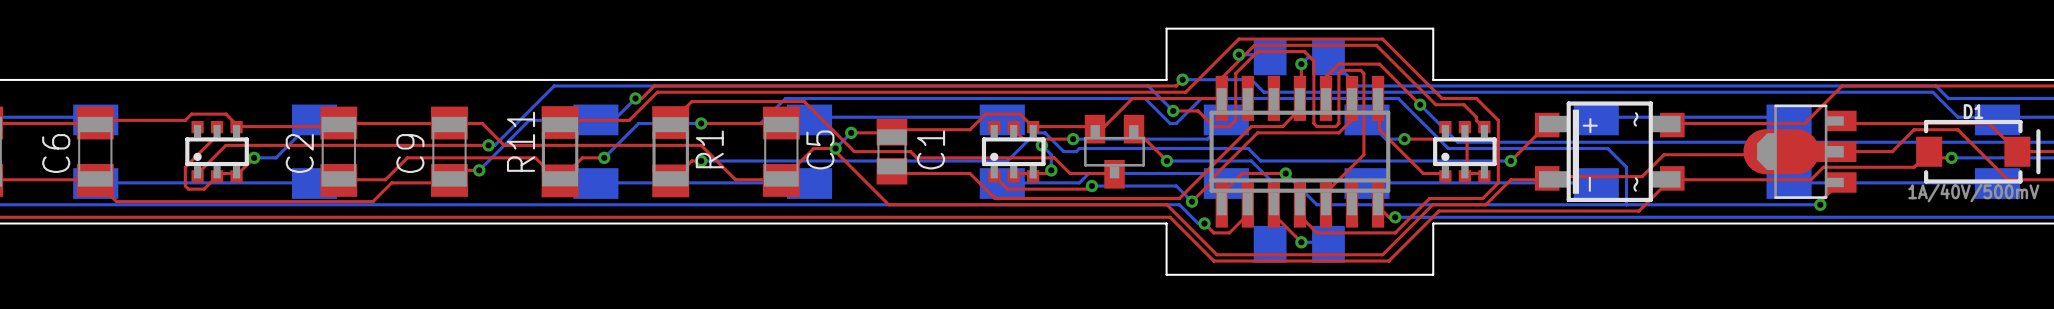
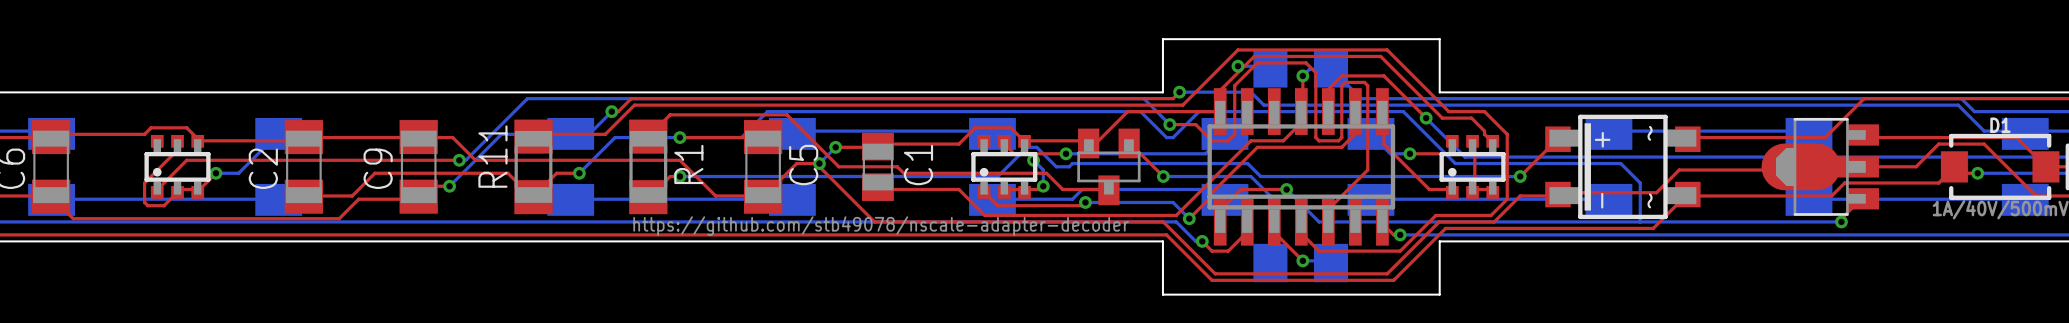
text: none -> https://github.com/stb49078/nscale-adapter-decoder (881, 226)

